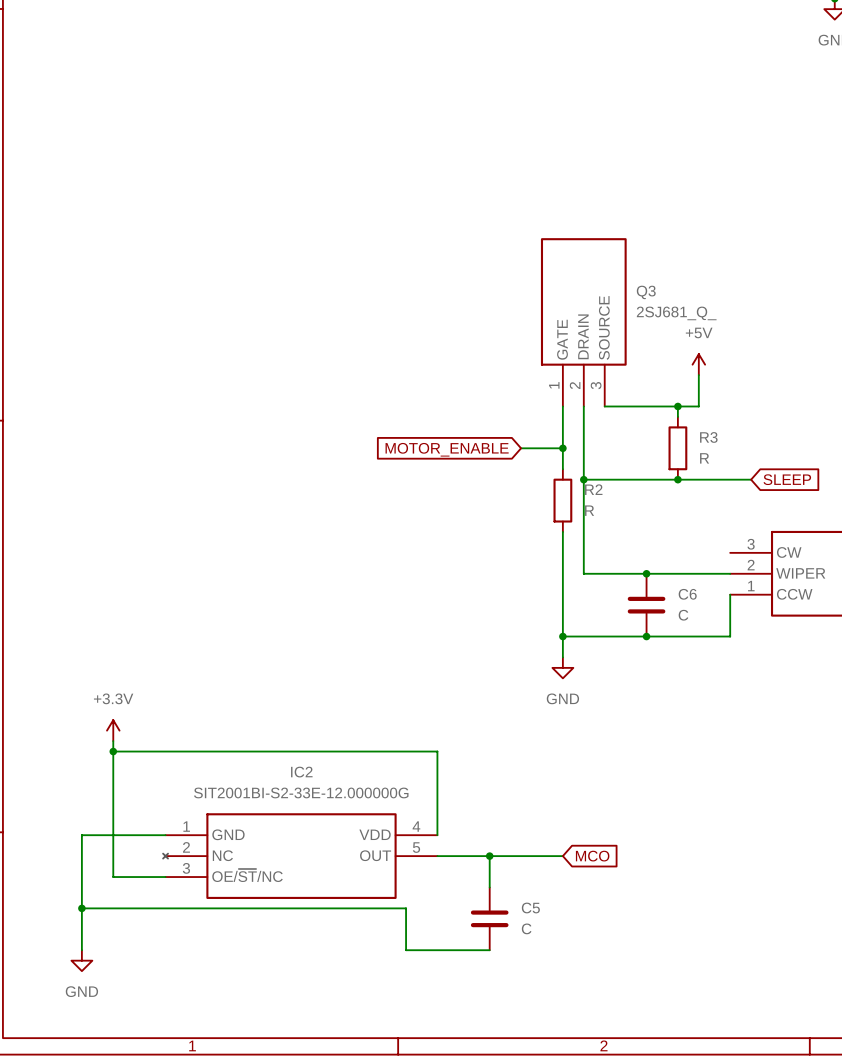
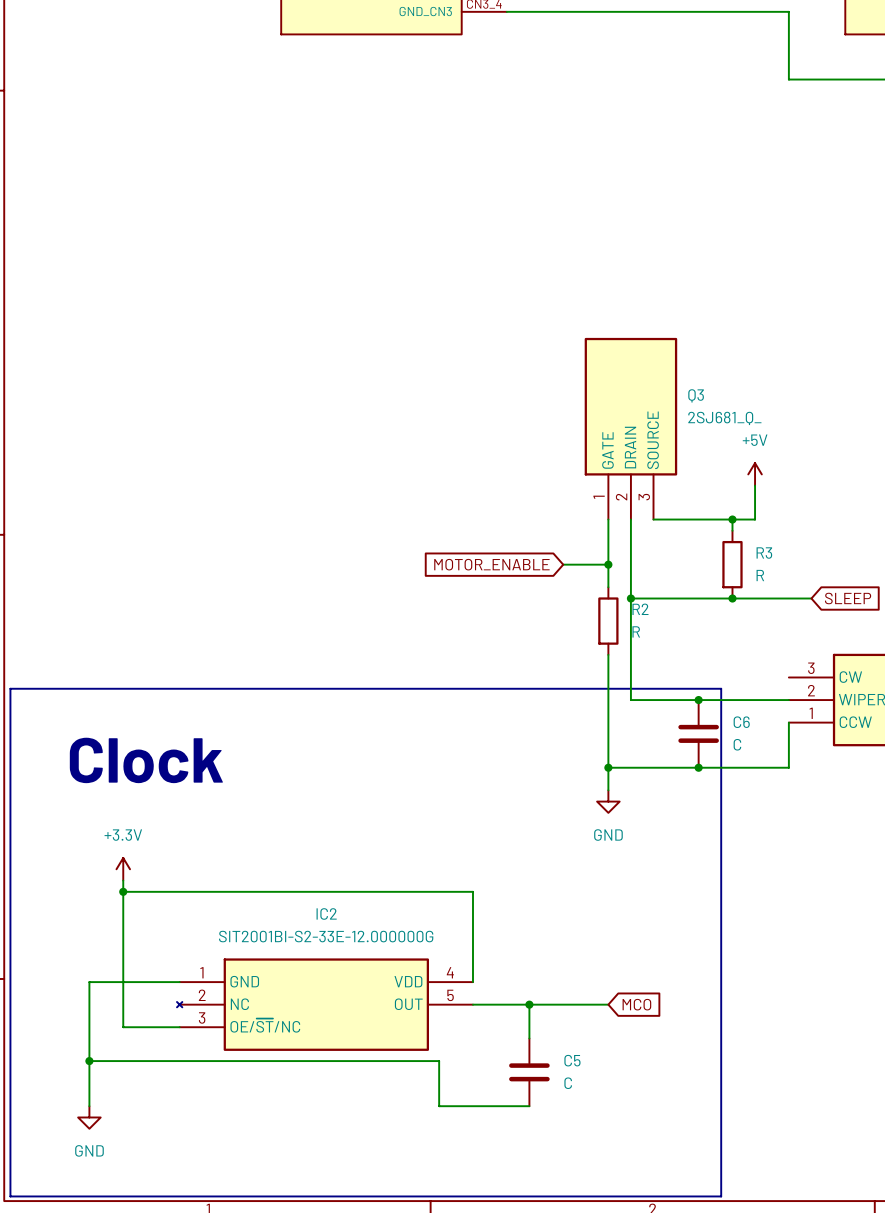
line: none -> (10, 688) (721, 688) (721, 1196) (10, 1196) (10, 688)
text: none -> Clock (146, 760)

